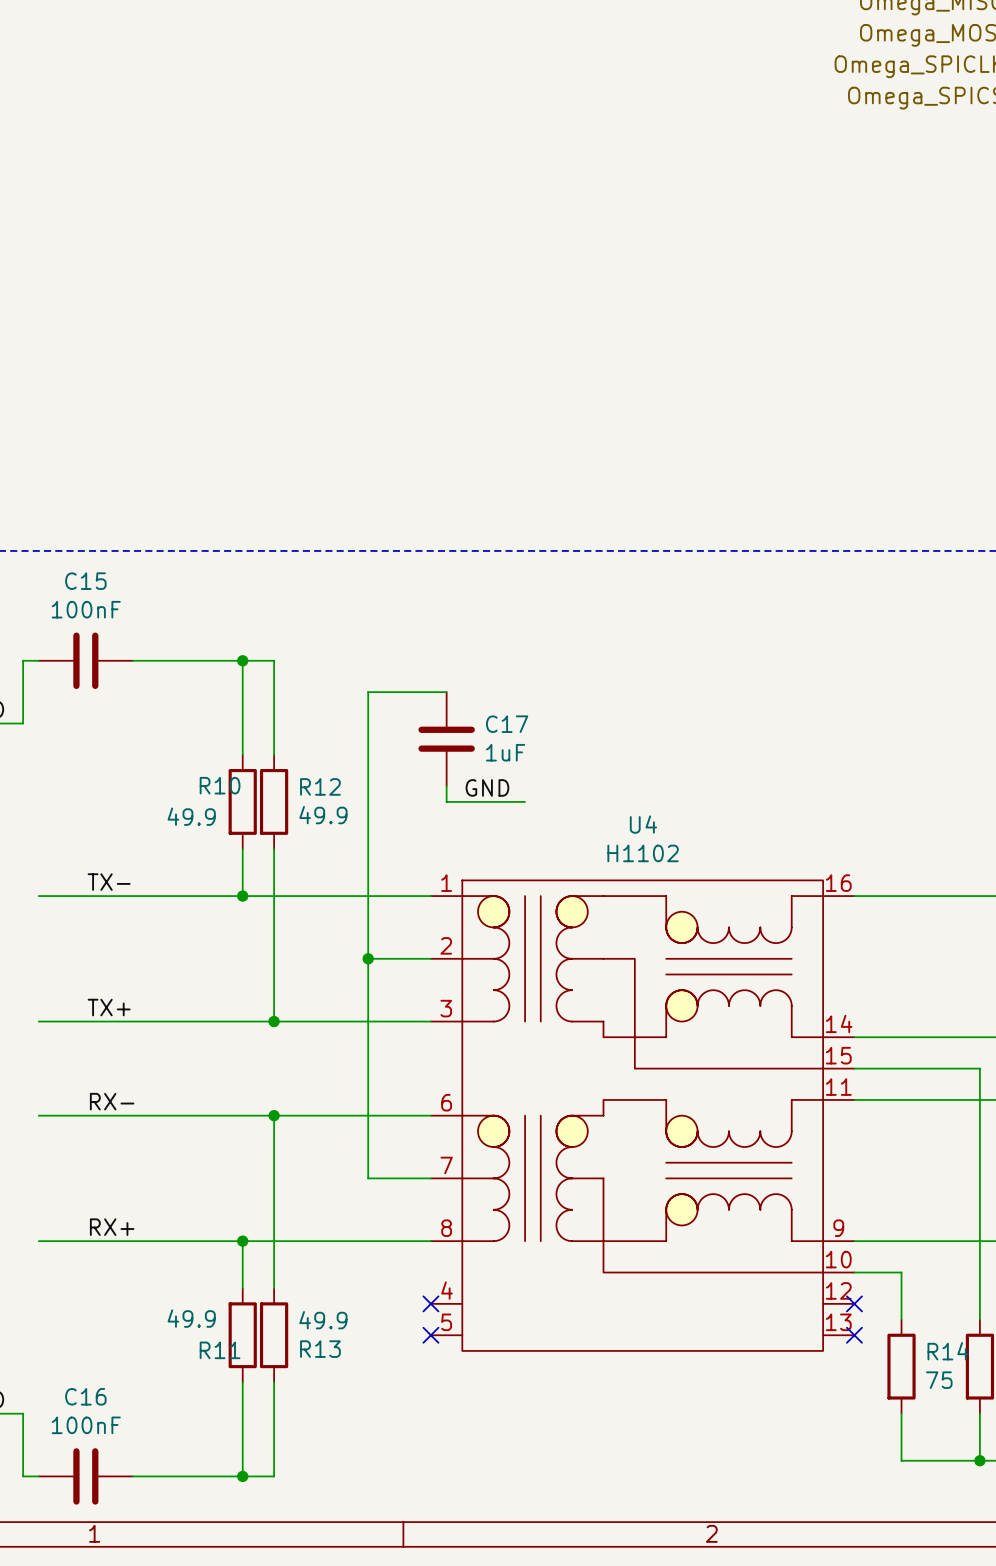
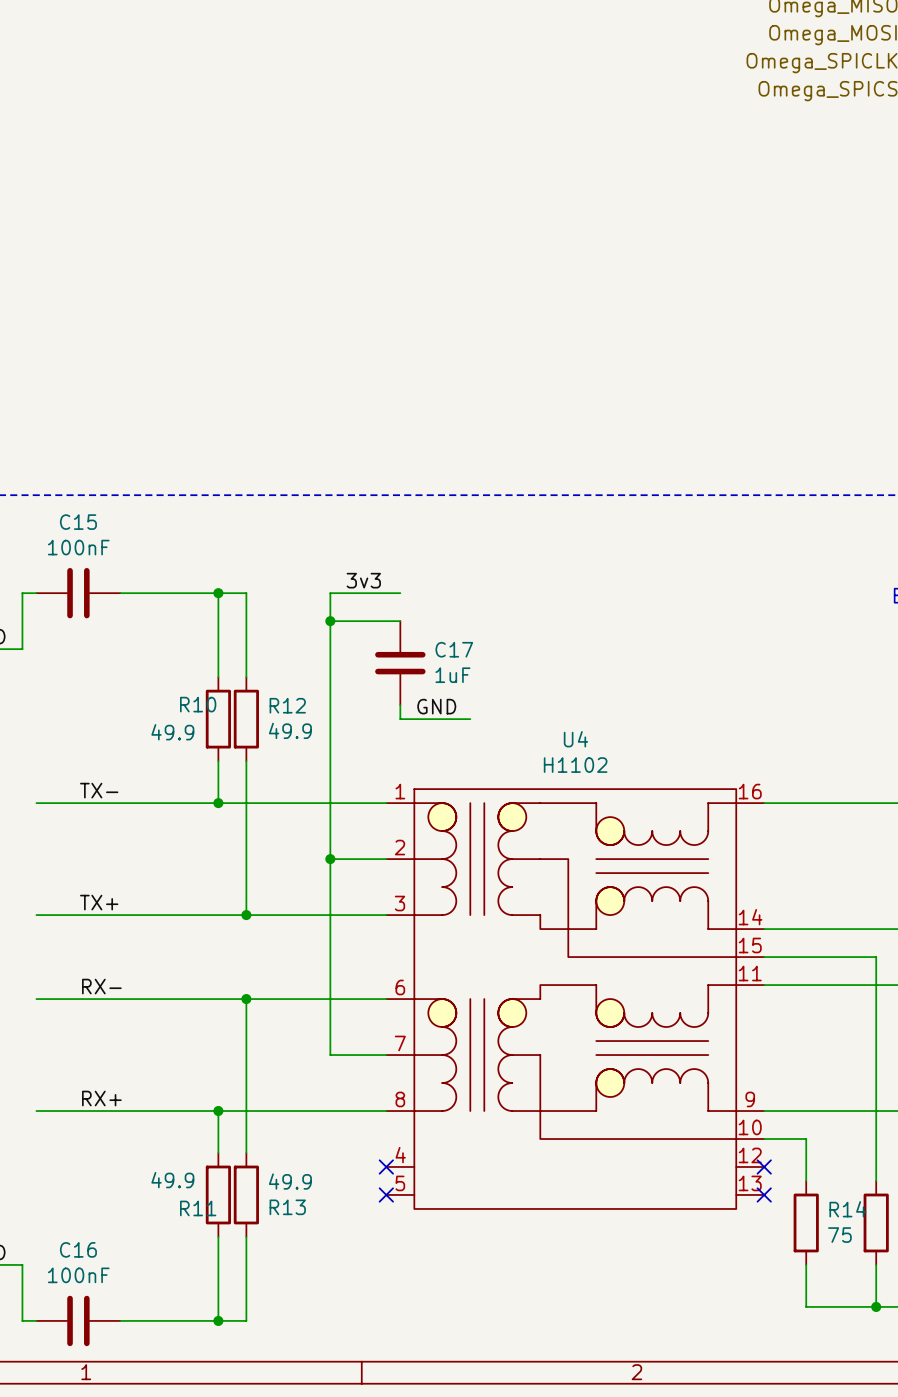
label: none -> 3v3 (363, 580)
wire: none -> (400, 593) (330, 593) (330, 621)
junction: none -> (330, 621)

